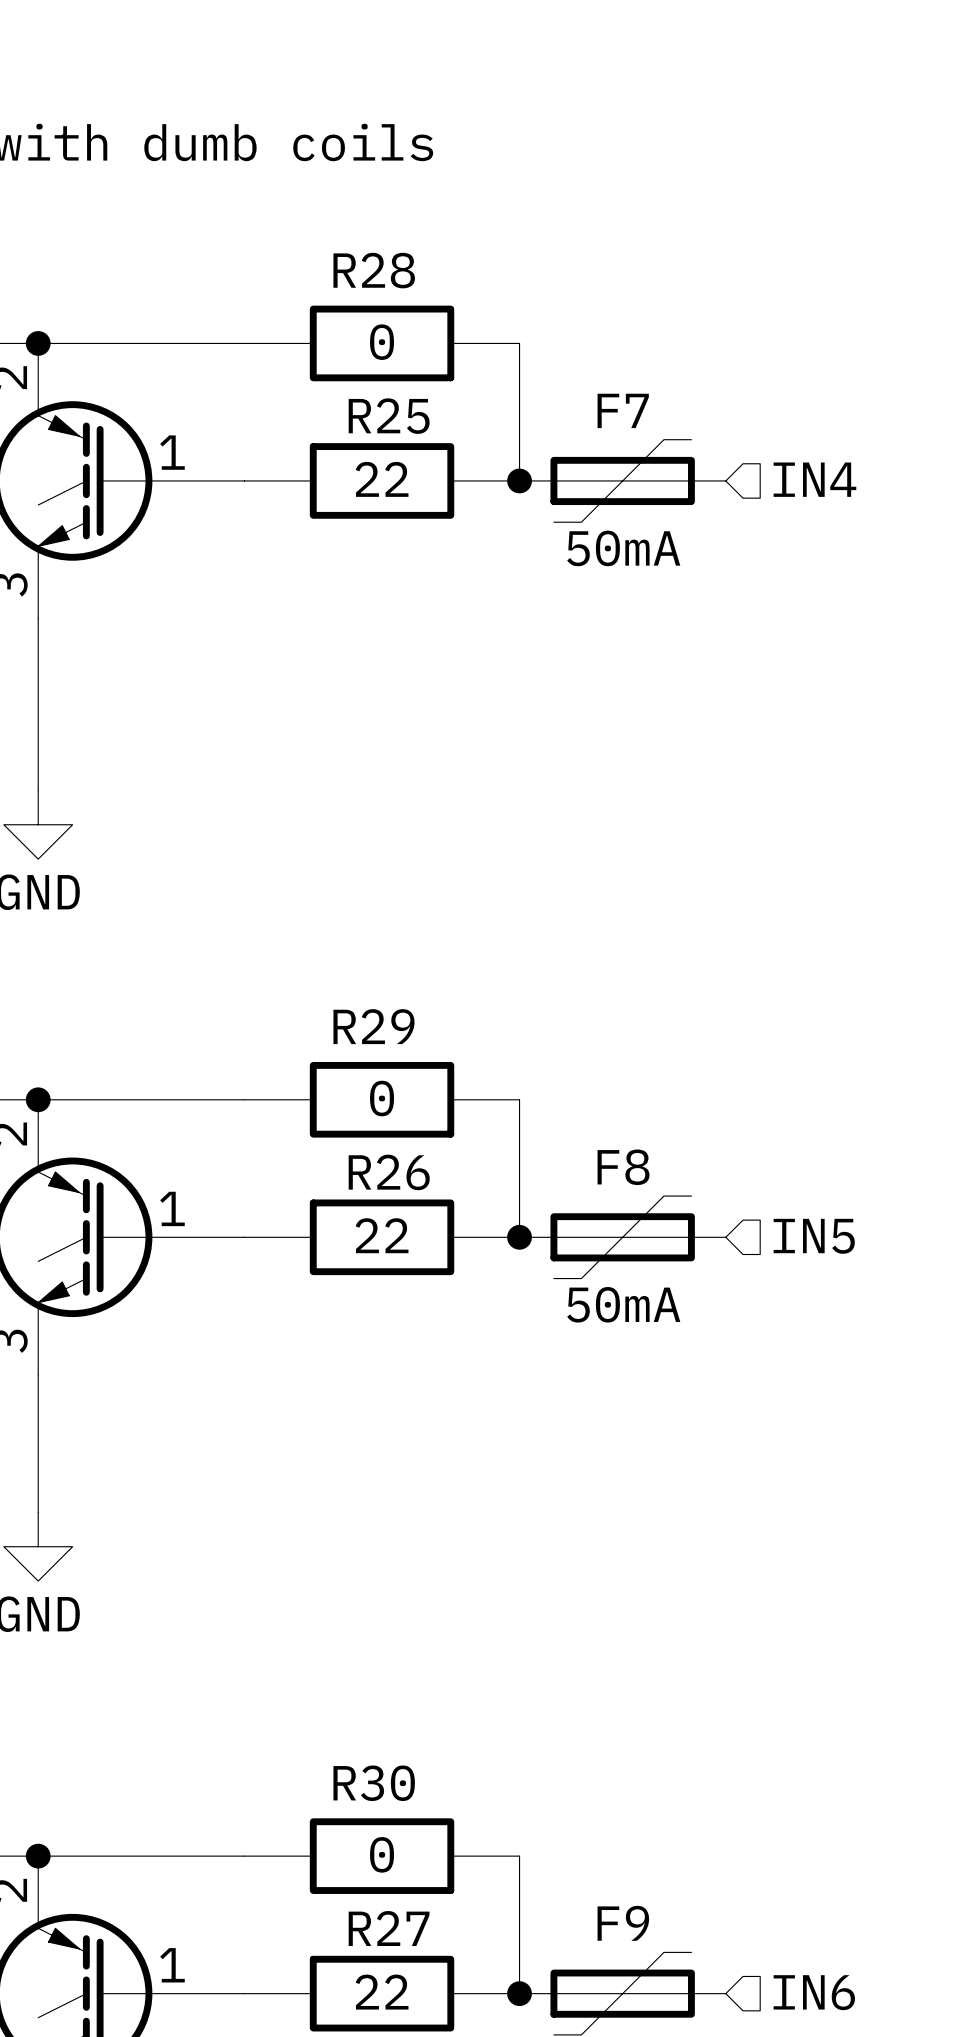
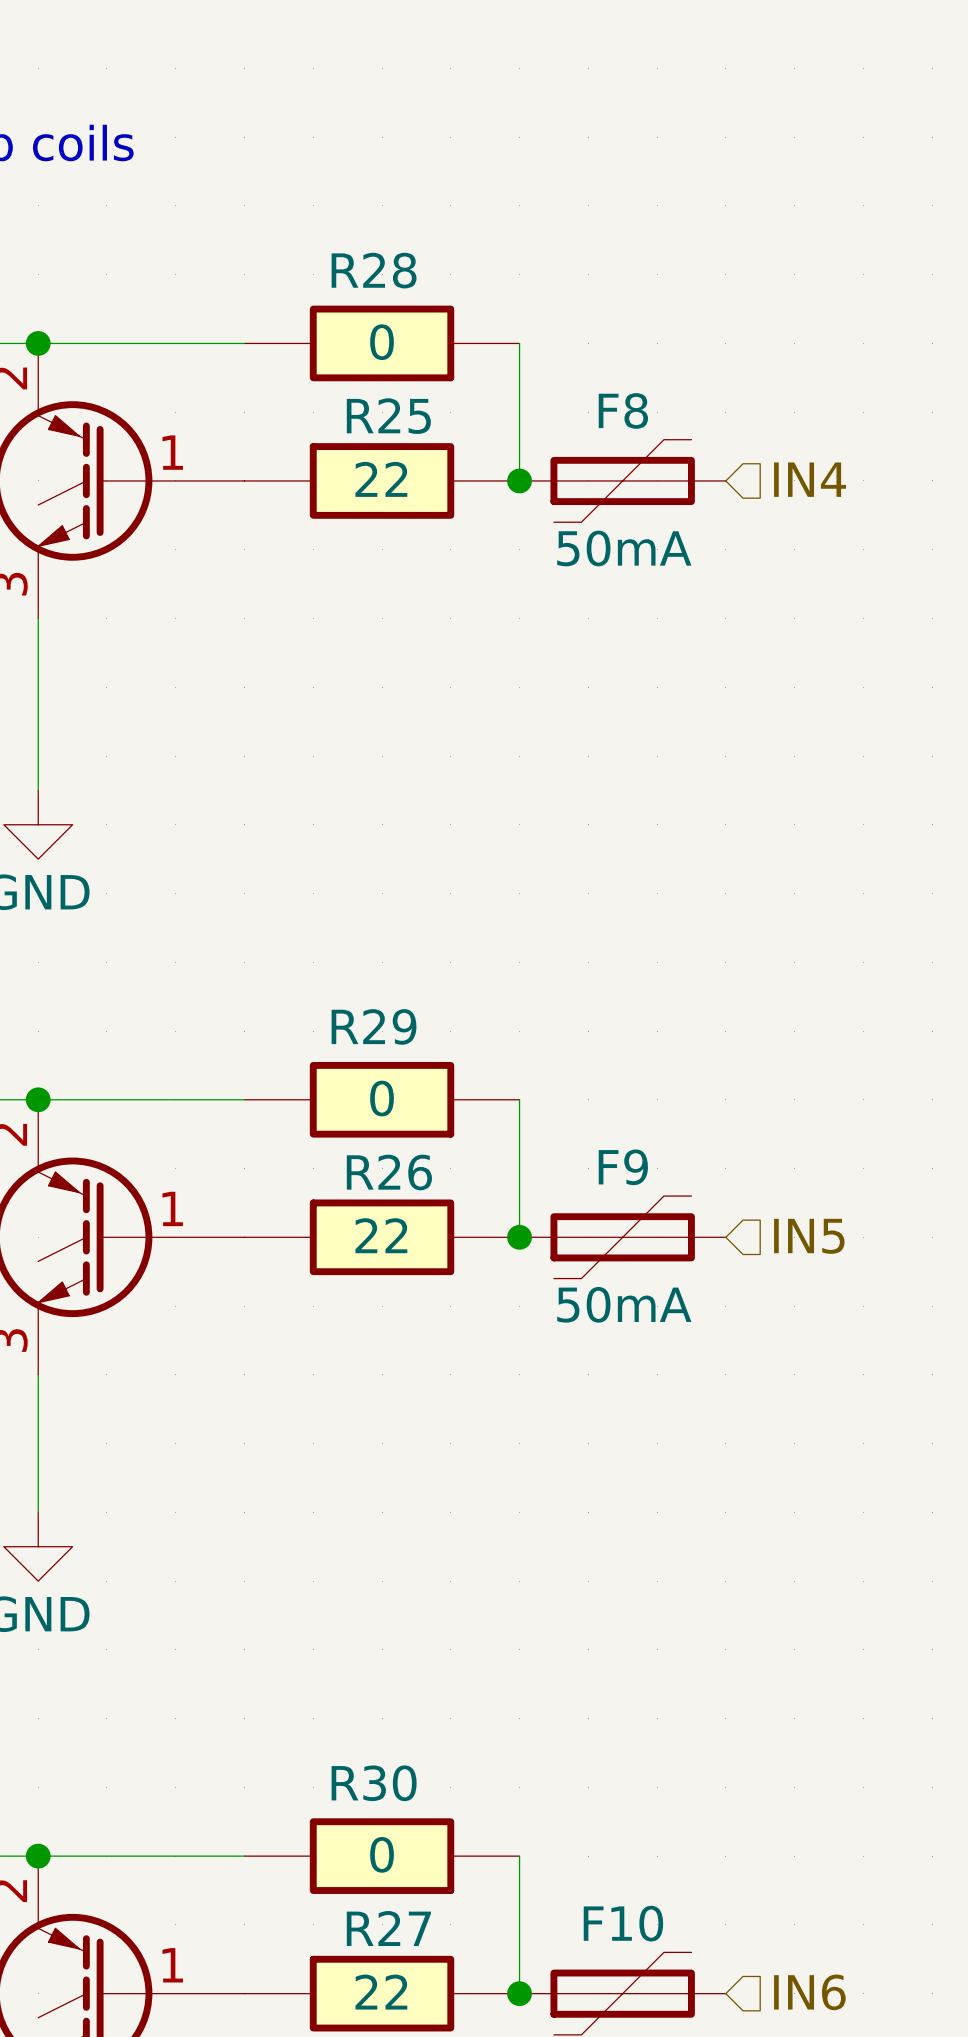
F7 name: F7 (623, 410) -> F8 (623, 410)
F8 name: F8 (623, 1167) -> F9 (623, 1167)
F9 name: F9 (623, 1923) -> F10 (623, 1923)

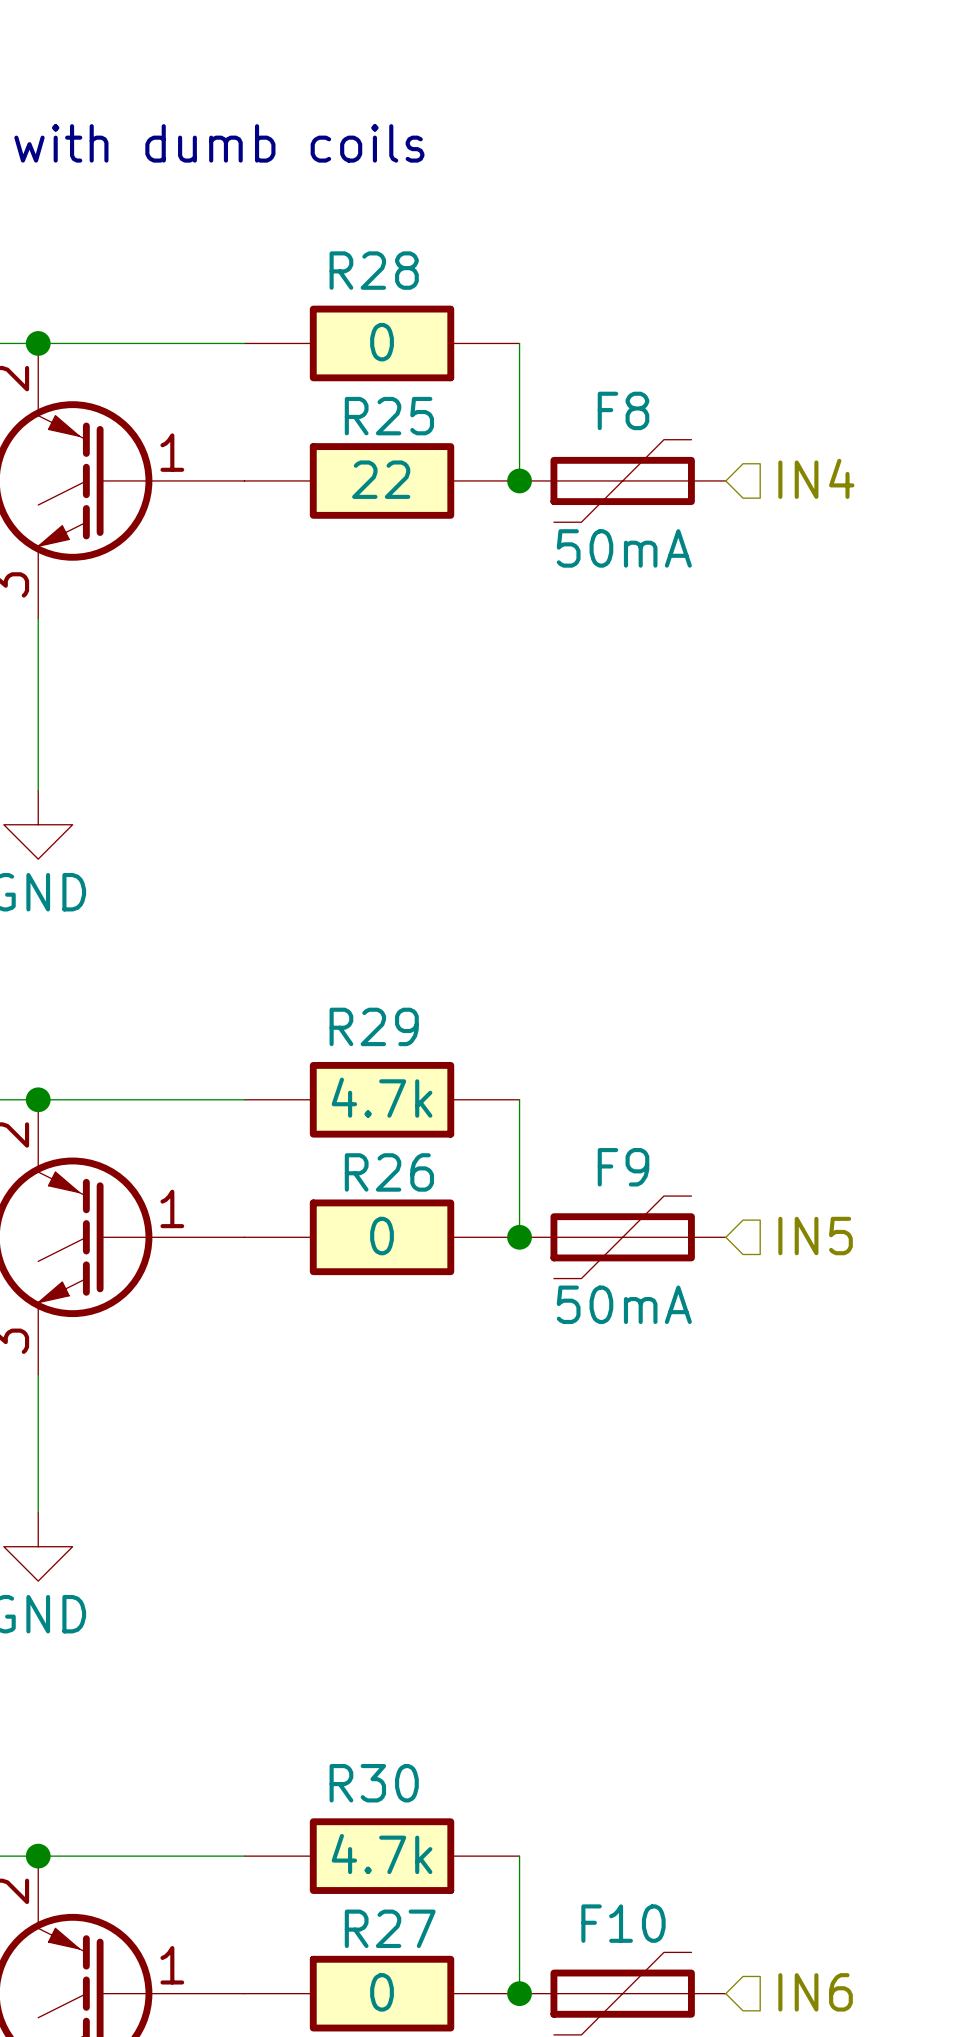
R29 value: 0 (382, 1098) -> 4.7k (382, 1097)
R26 value: 22 (381, 1235) -> 0 (382, 1236)
R30 value: 0 (382, 1854) -> 4.7k (382, 1854)
R27 value: 22 (381, 1992) -> 0 (382, 1992)

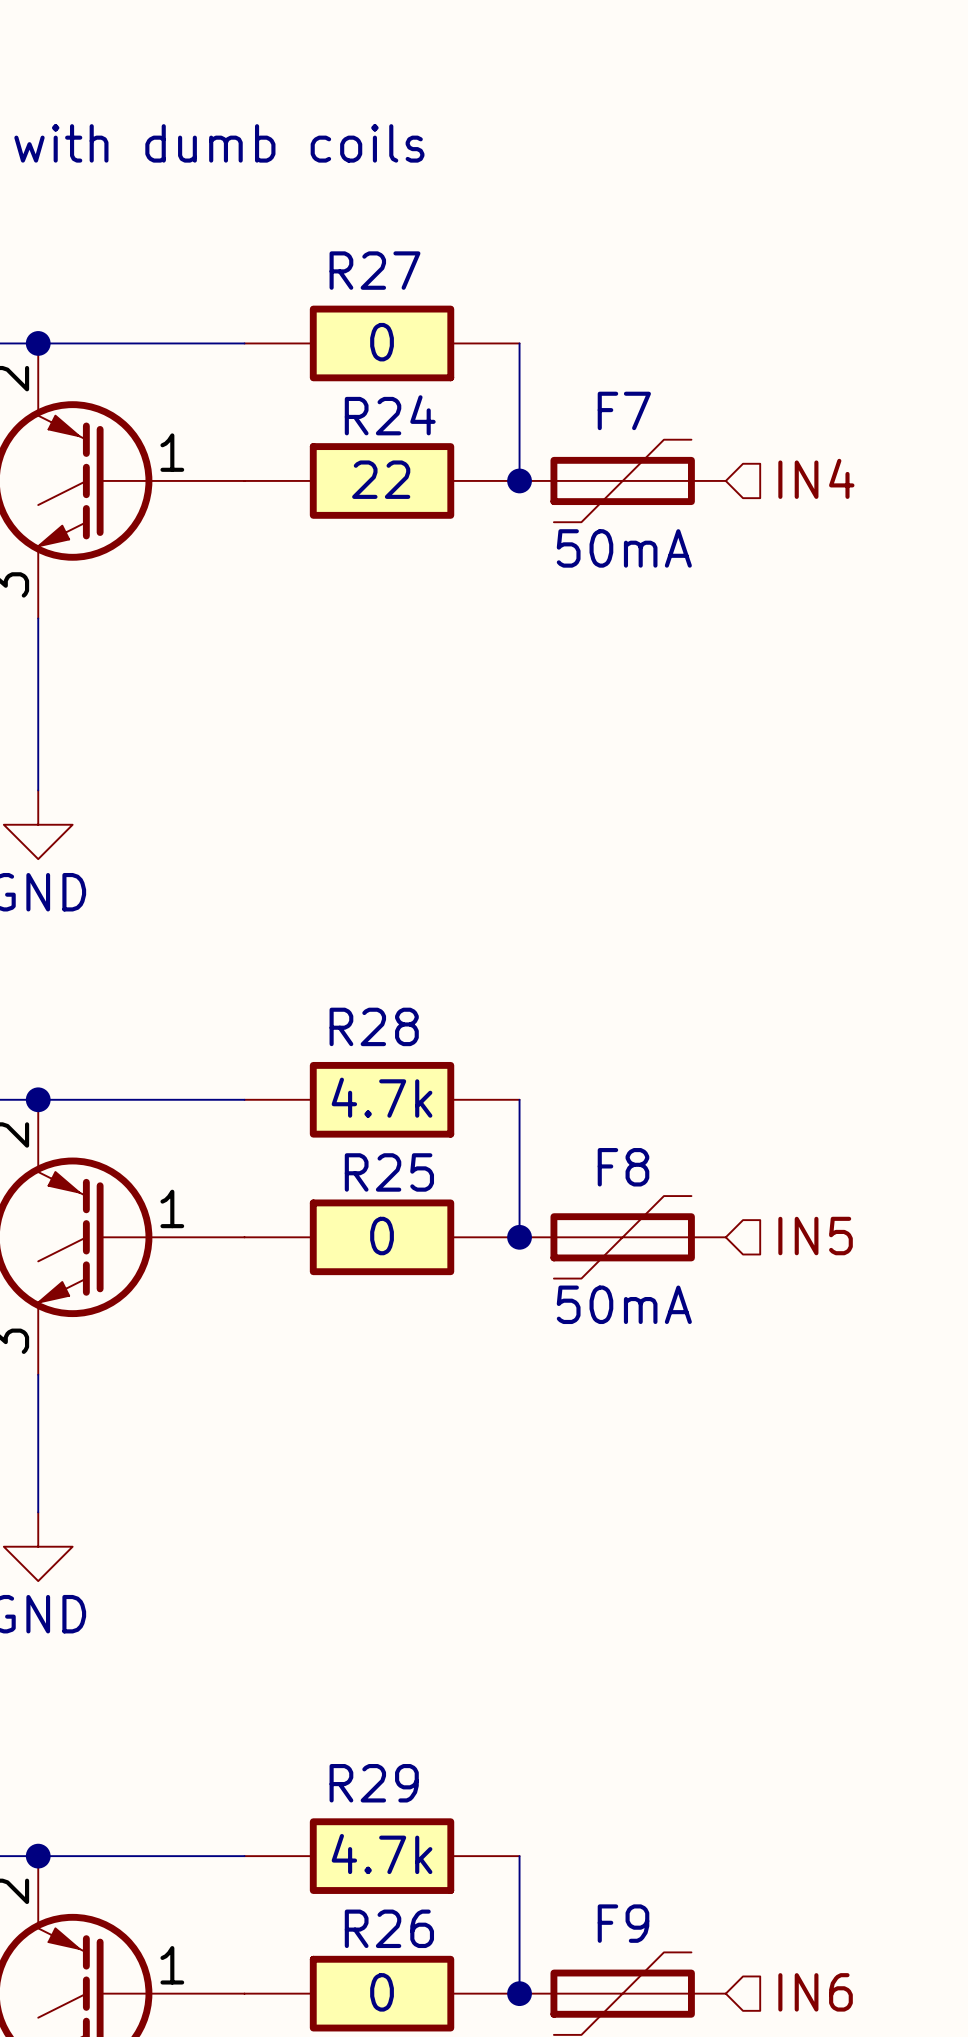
R28 name: R28 (374, 270) -> R27 (374, 270)
F8 name: F8 (623, 410) -> F7 (624, 410)
R25 name: R25 (389, 416) -> R24 (390, 415)
R29 name: R29 (374, 1026) -> R28 (374, 1026)
F9 name: F9 (623, 1167) -> F8 (623, 1167)
R26 name: R26 (389, 1172) -> R25 (389, 1172)
R30 name: R30 (374, 1783) -> R29 (374, 1783)
F10 name: F10 (623, 1923) -> F9 (623, 1923)
R27 name: R27 (390, 1928) -> R26 (389, 1928)

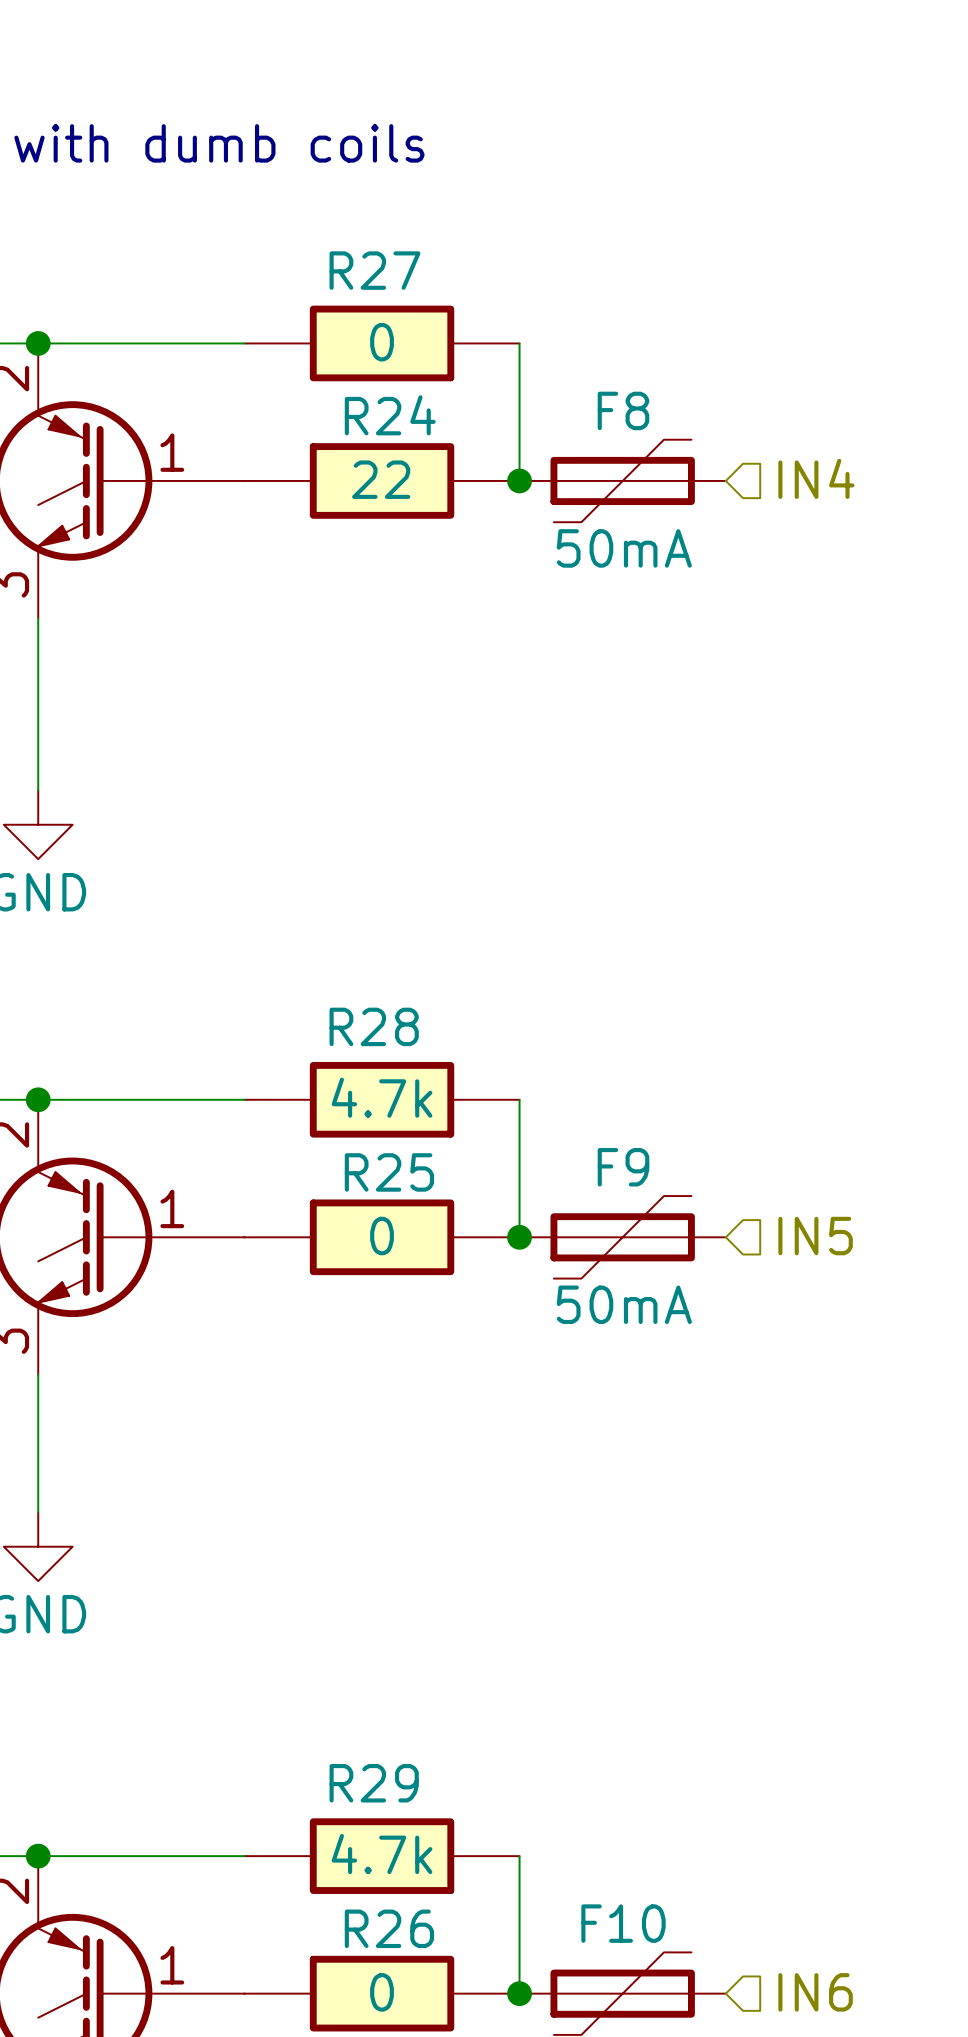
F7 name: F7 (624, 410) -> F8 (623, 410)
F8 name: F8 (623, 1167) -> F9 (623, 1167)
F9 name: F9 (623, 1923) -> F10 (623, 1923)

